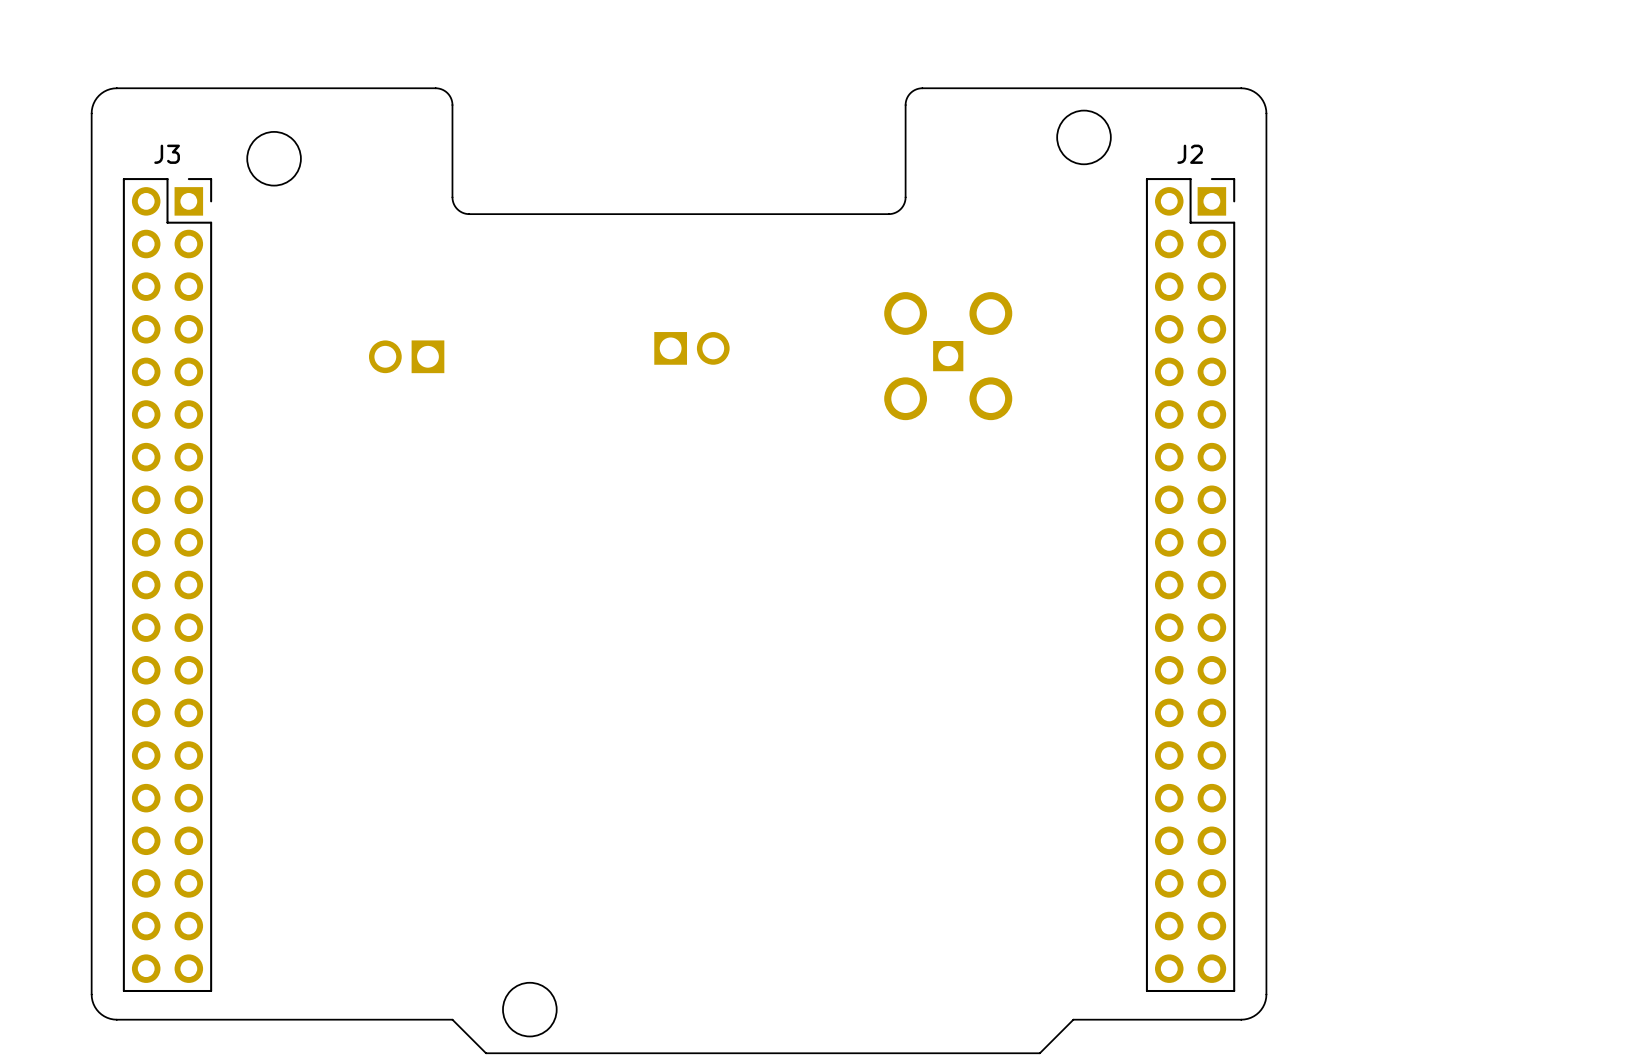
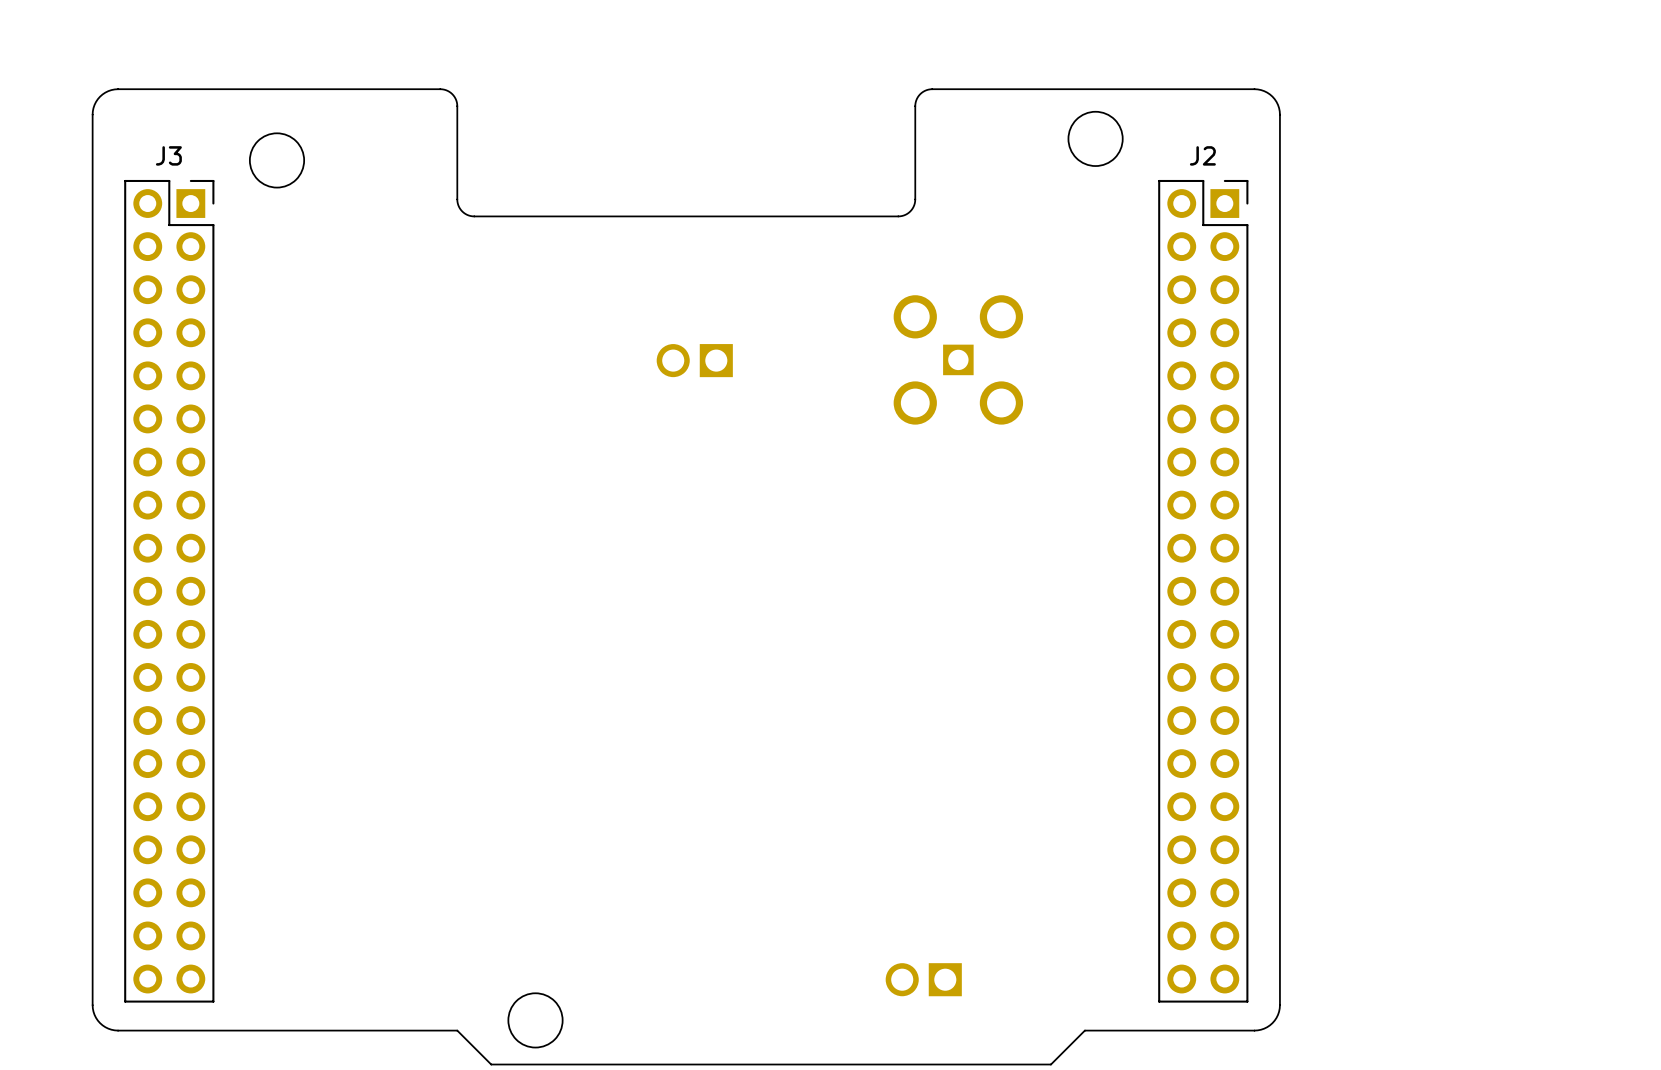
part rotation: 0° (691, 348) -> 180° (694, 360)
part: (406, 356) -> none
part: none -> (923, 979)

